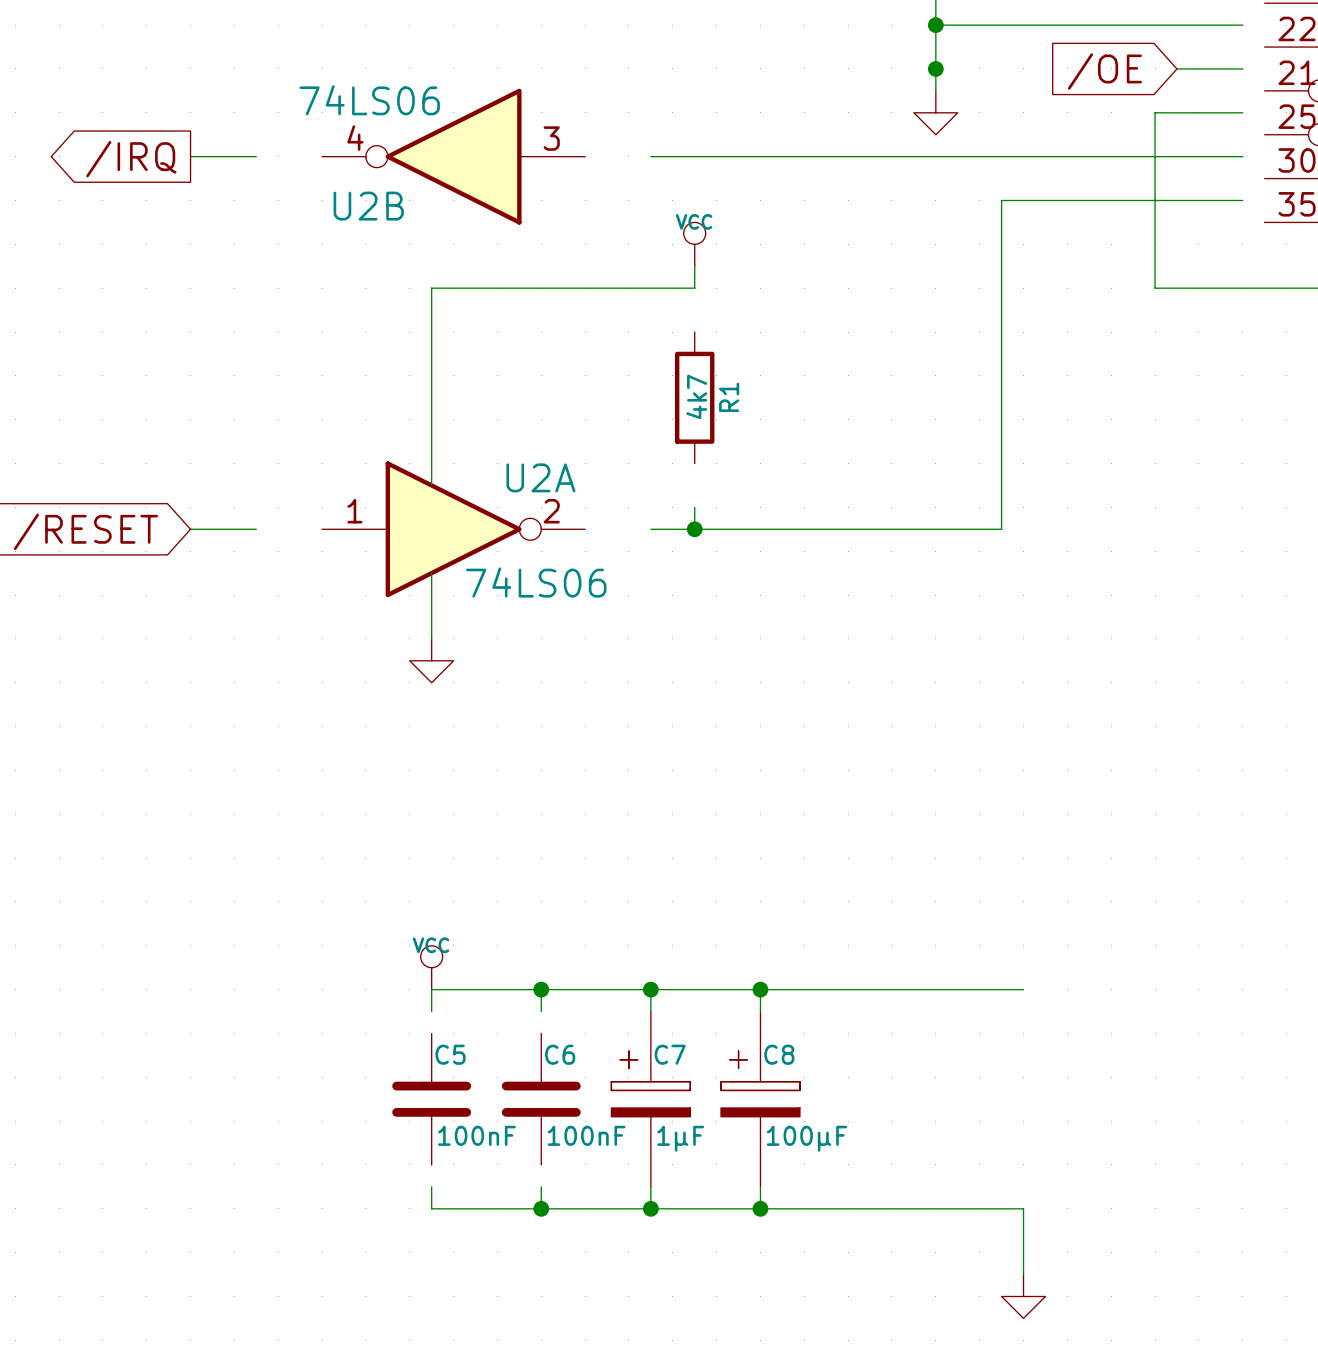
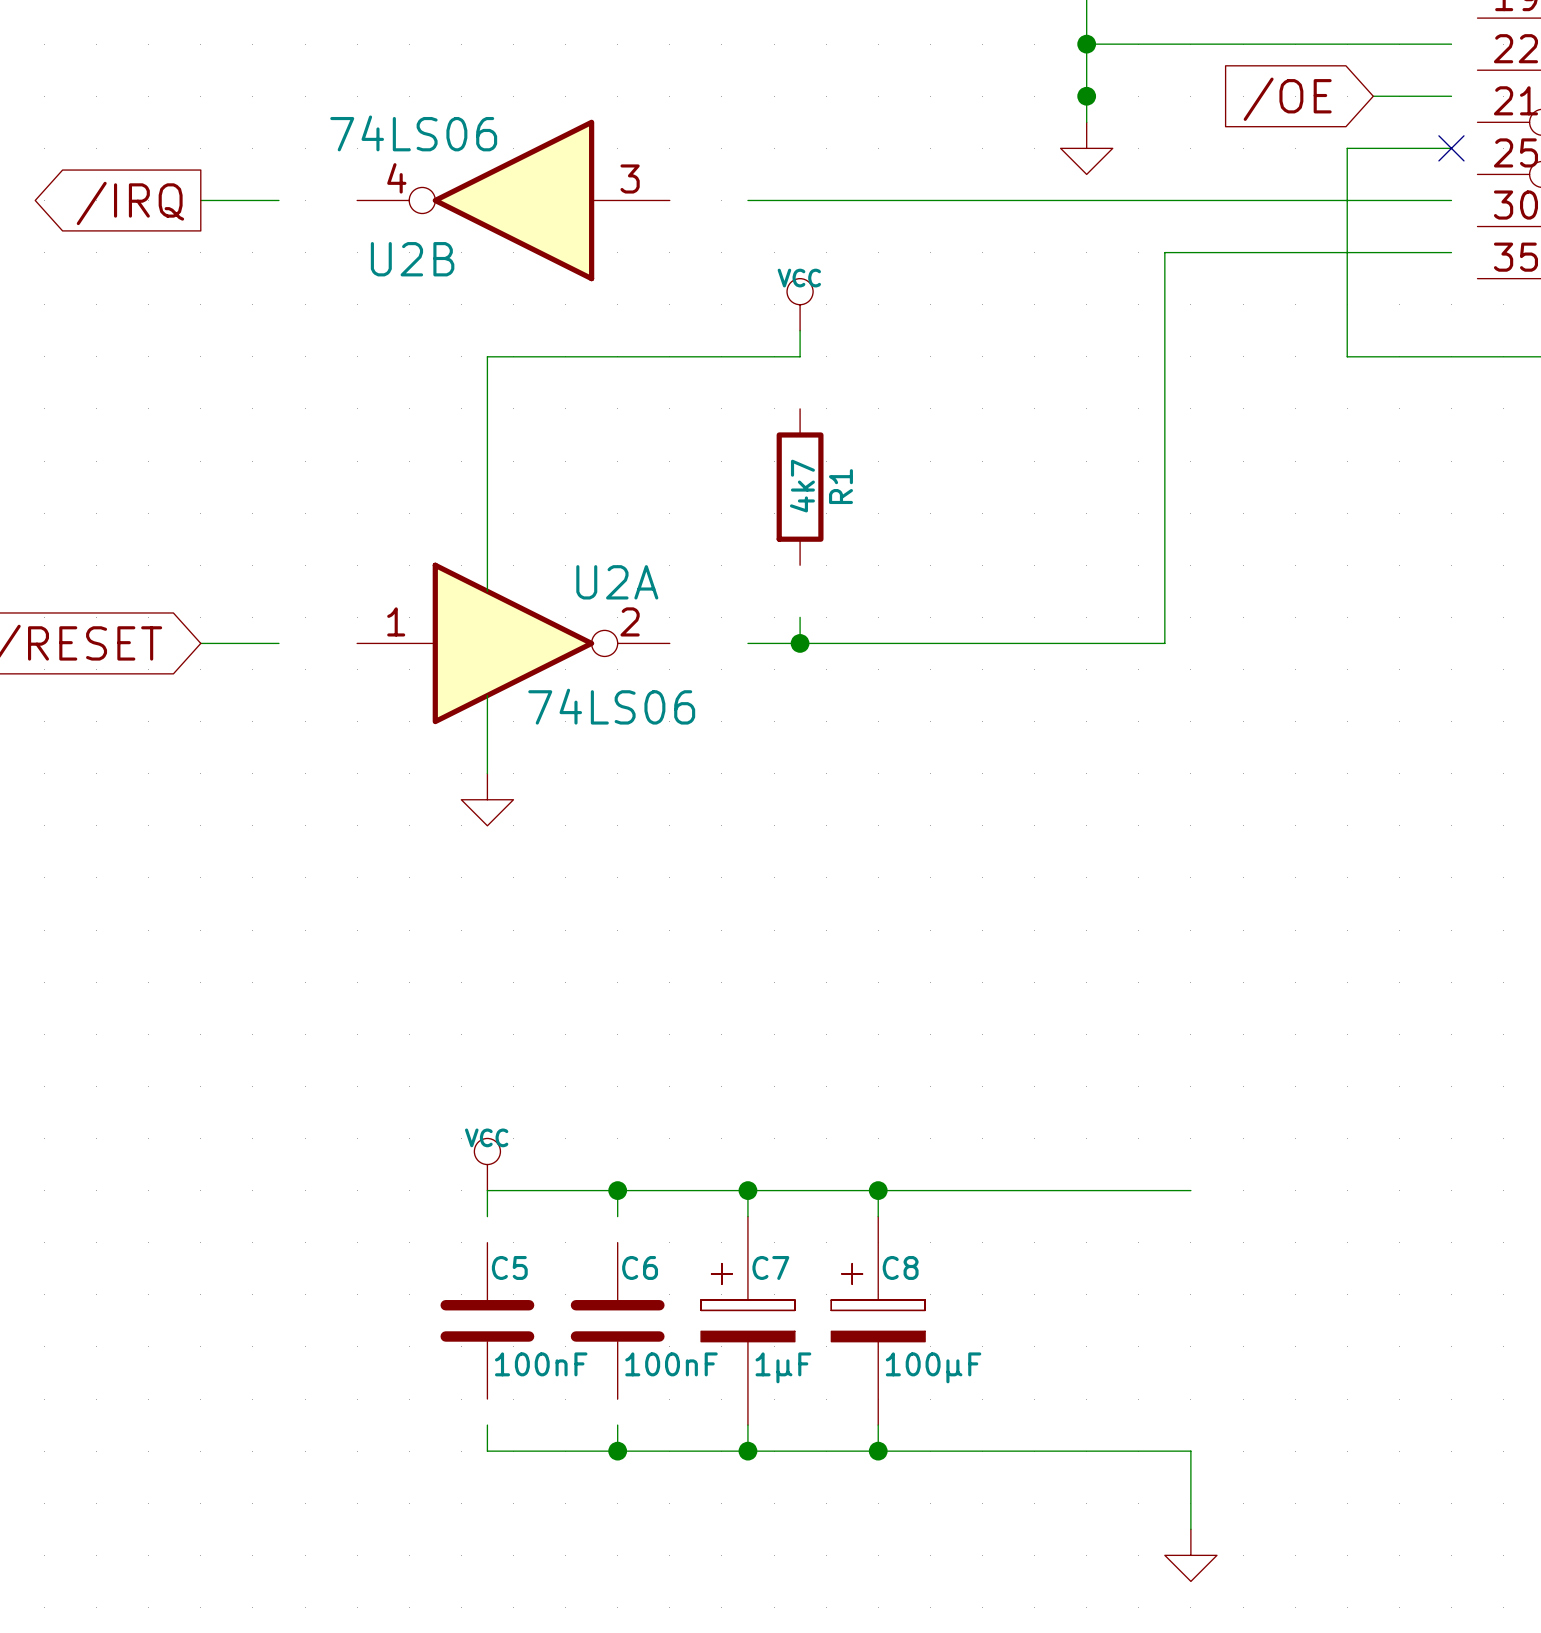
no-connect mark: none -> (1451, 148)

